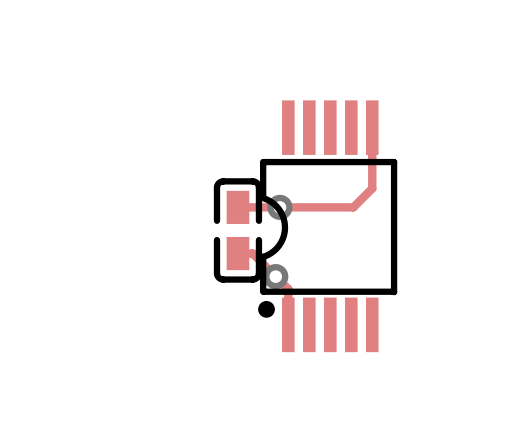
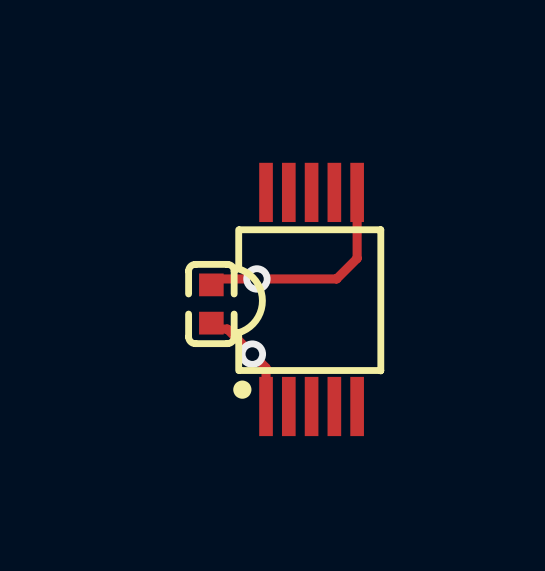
part footprint: [213, 178, 263, 283] -> [185, 260, 238, 348]

